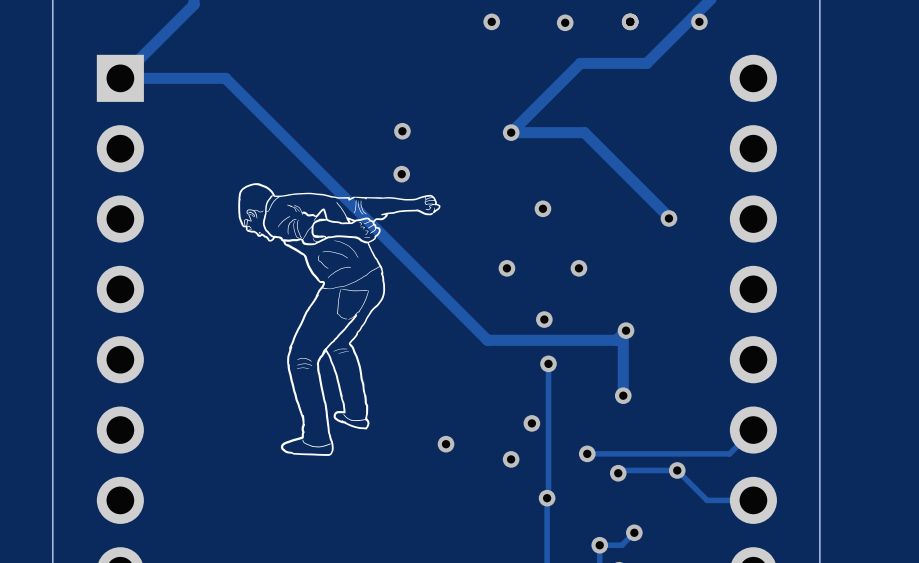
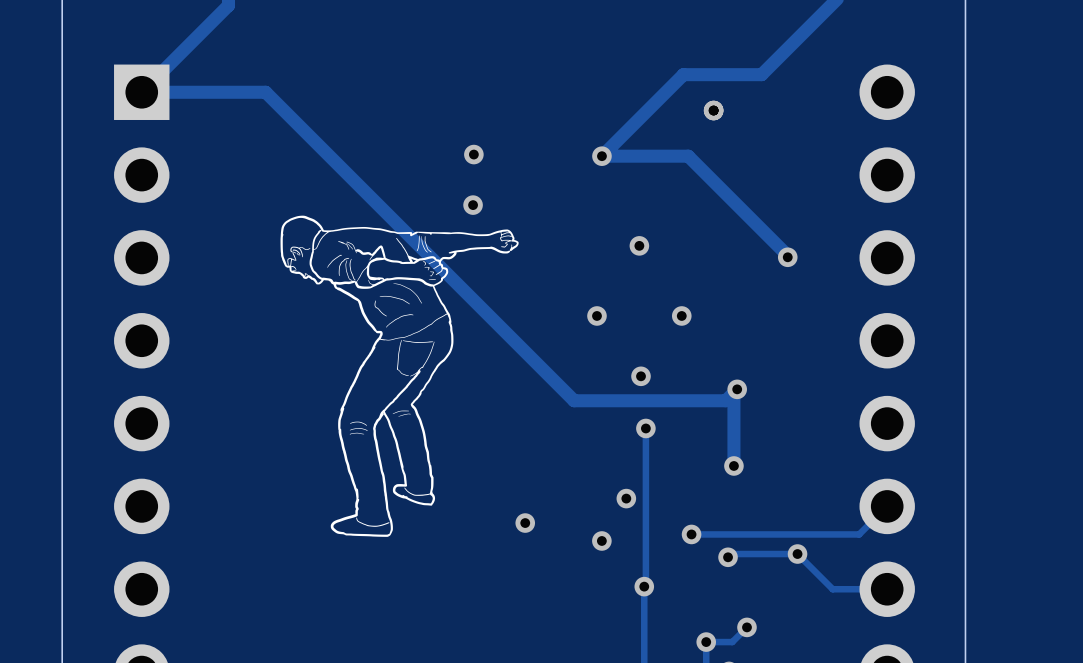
via: (491, 21) -> none
via: (630, 21) -> none
via: (699, 21) -> none
via: (565, 22) -> none
via: none -> (713, 110)

